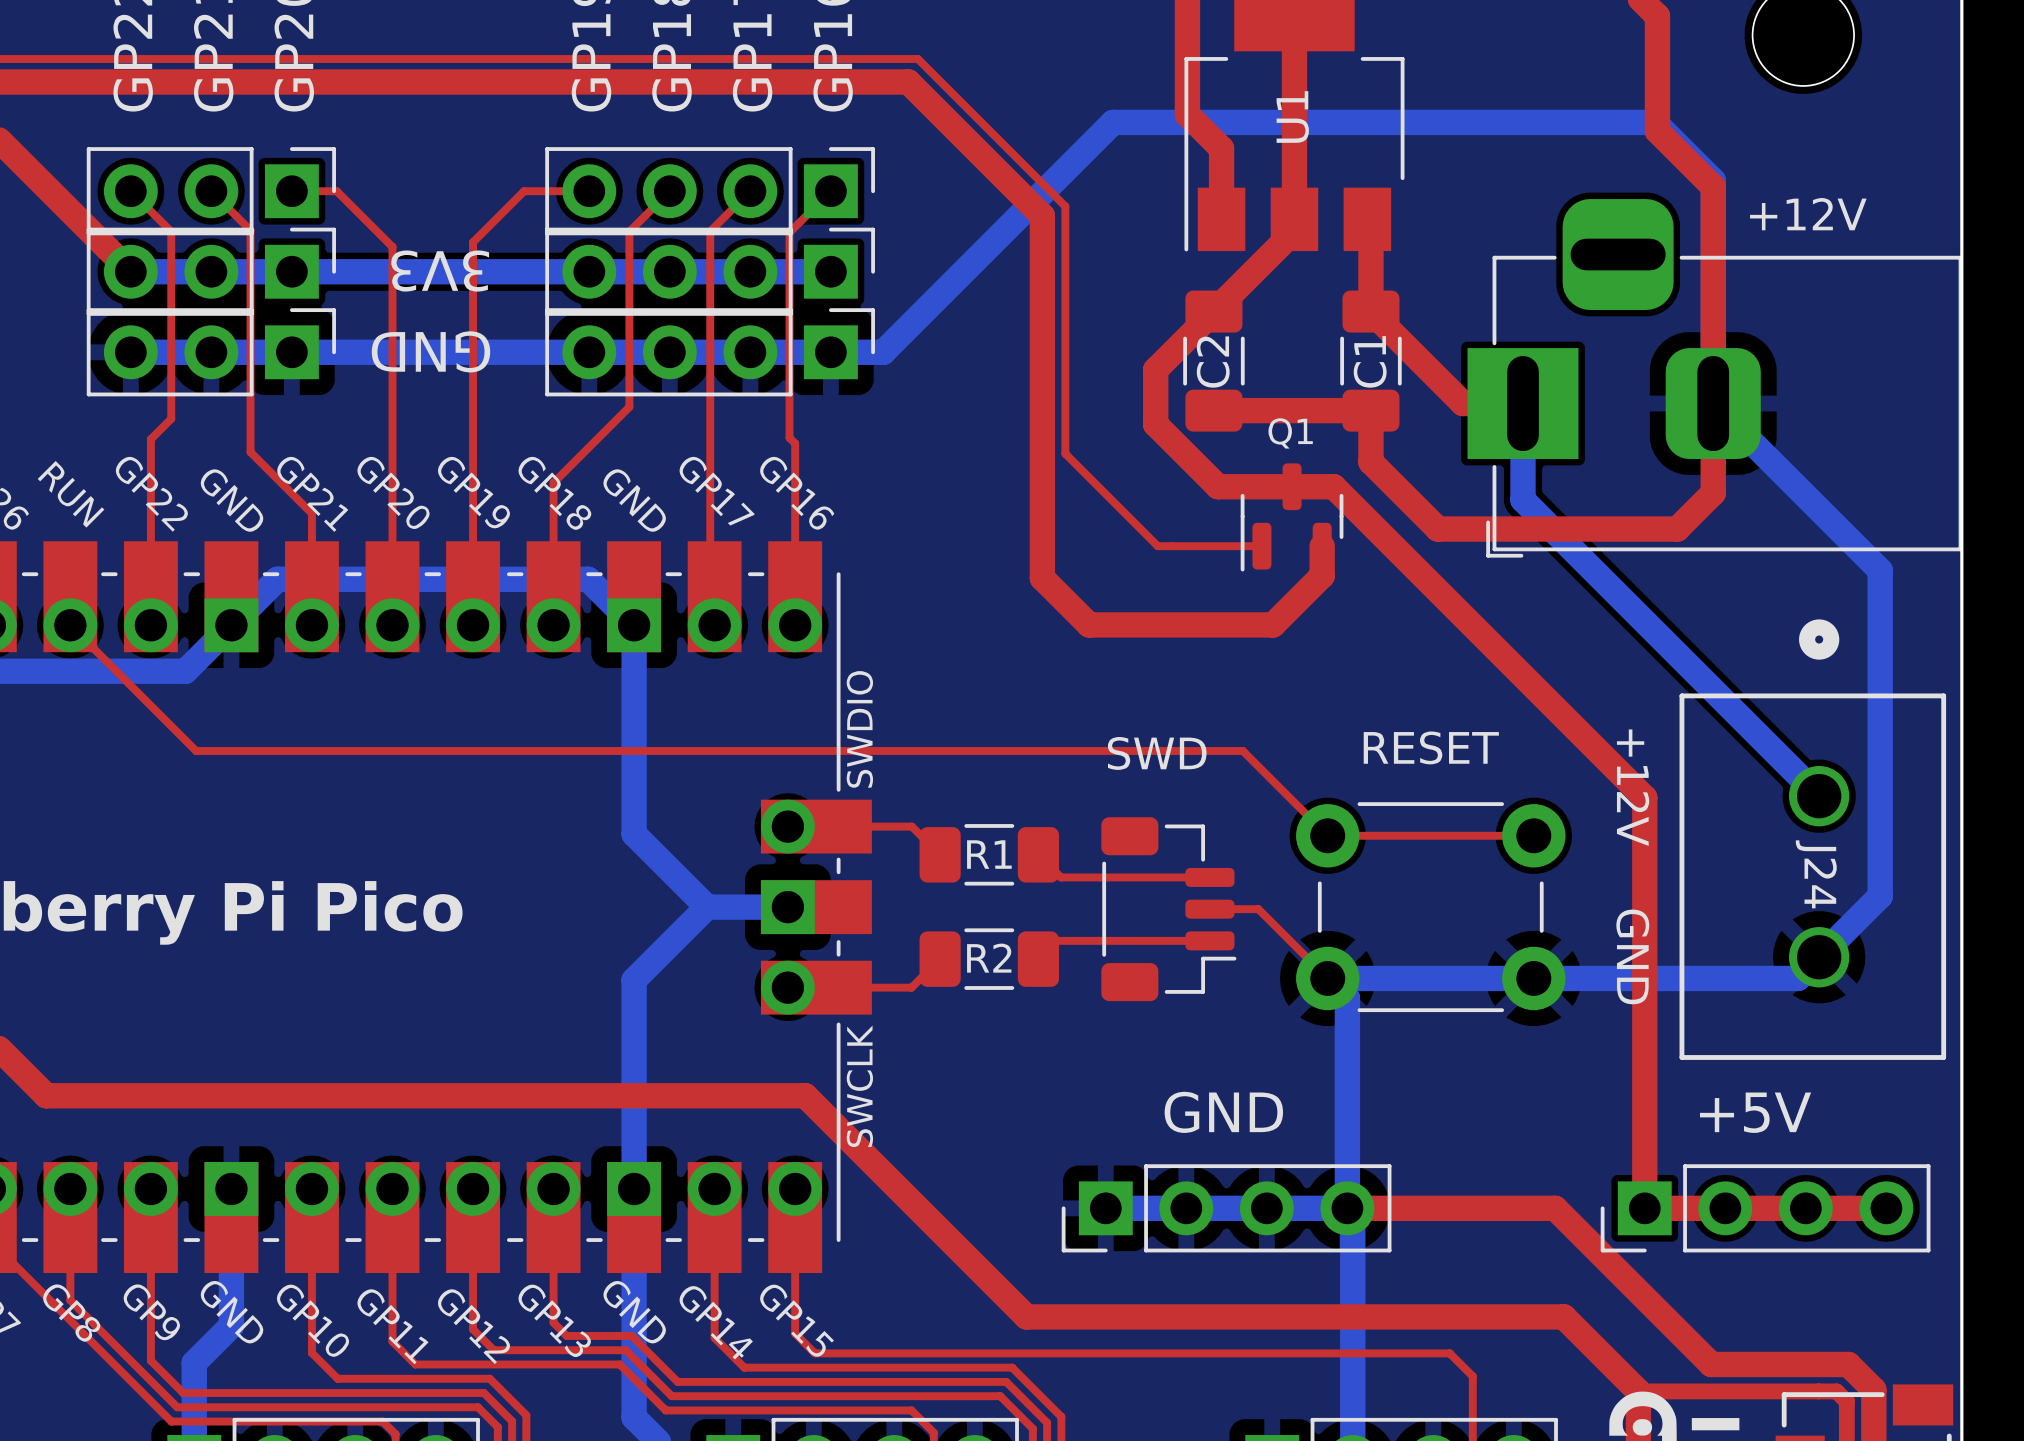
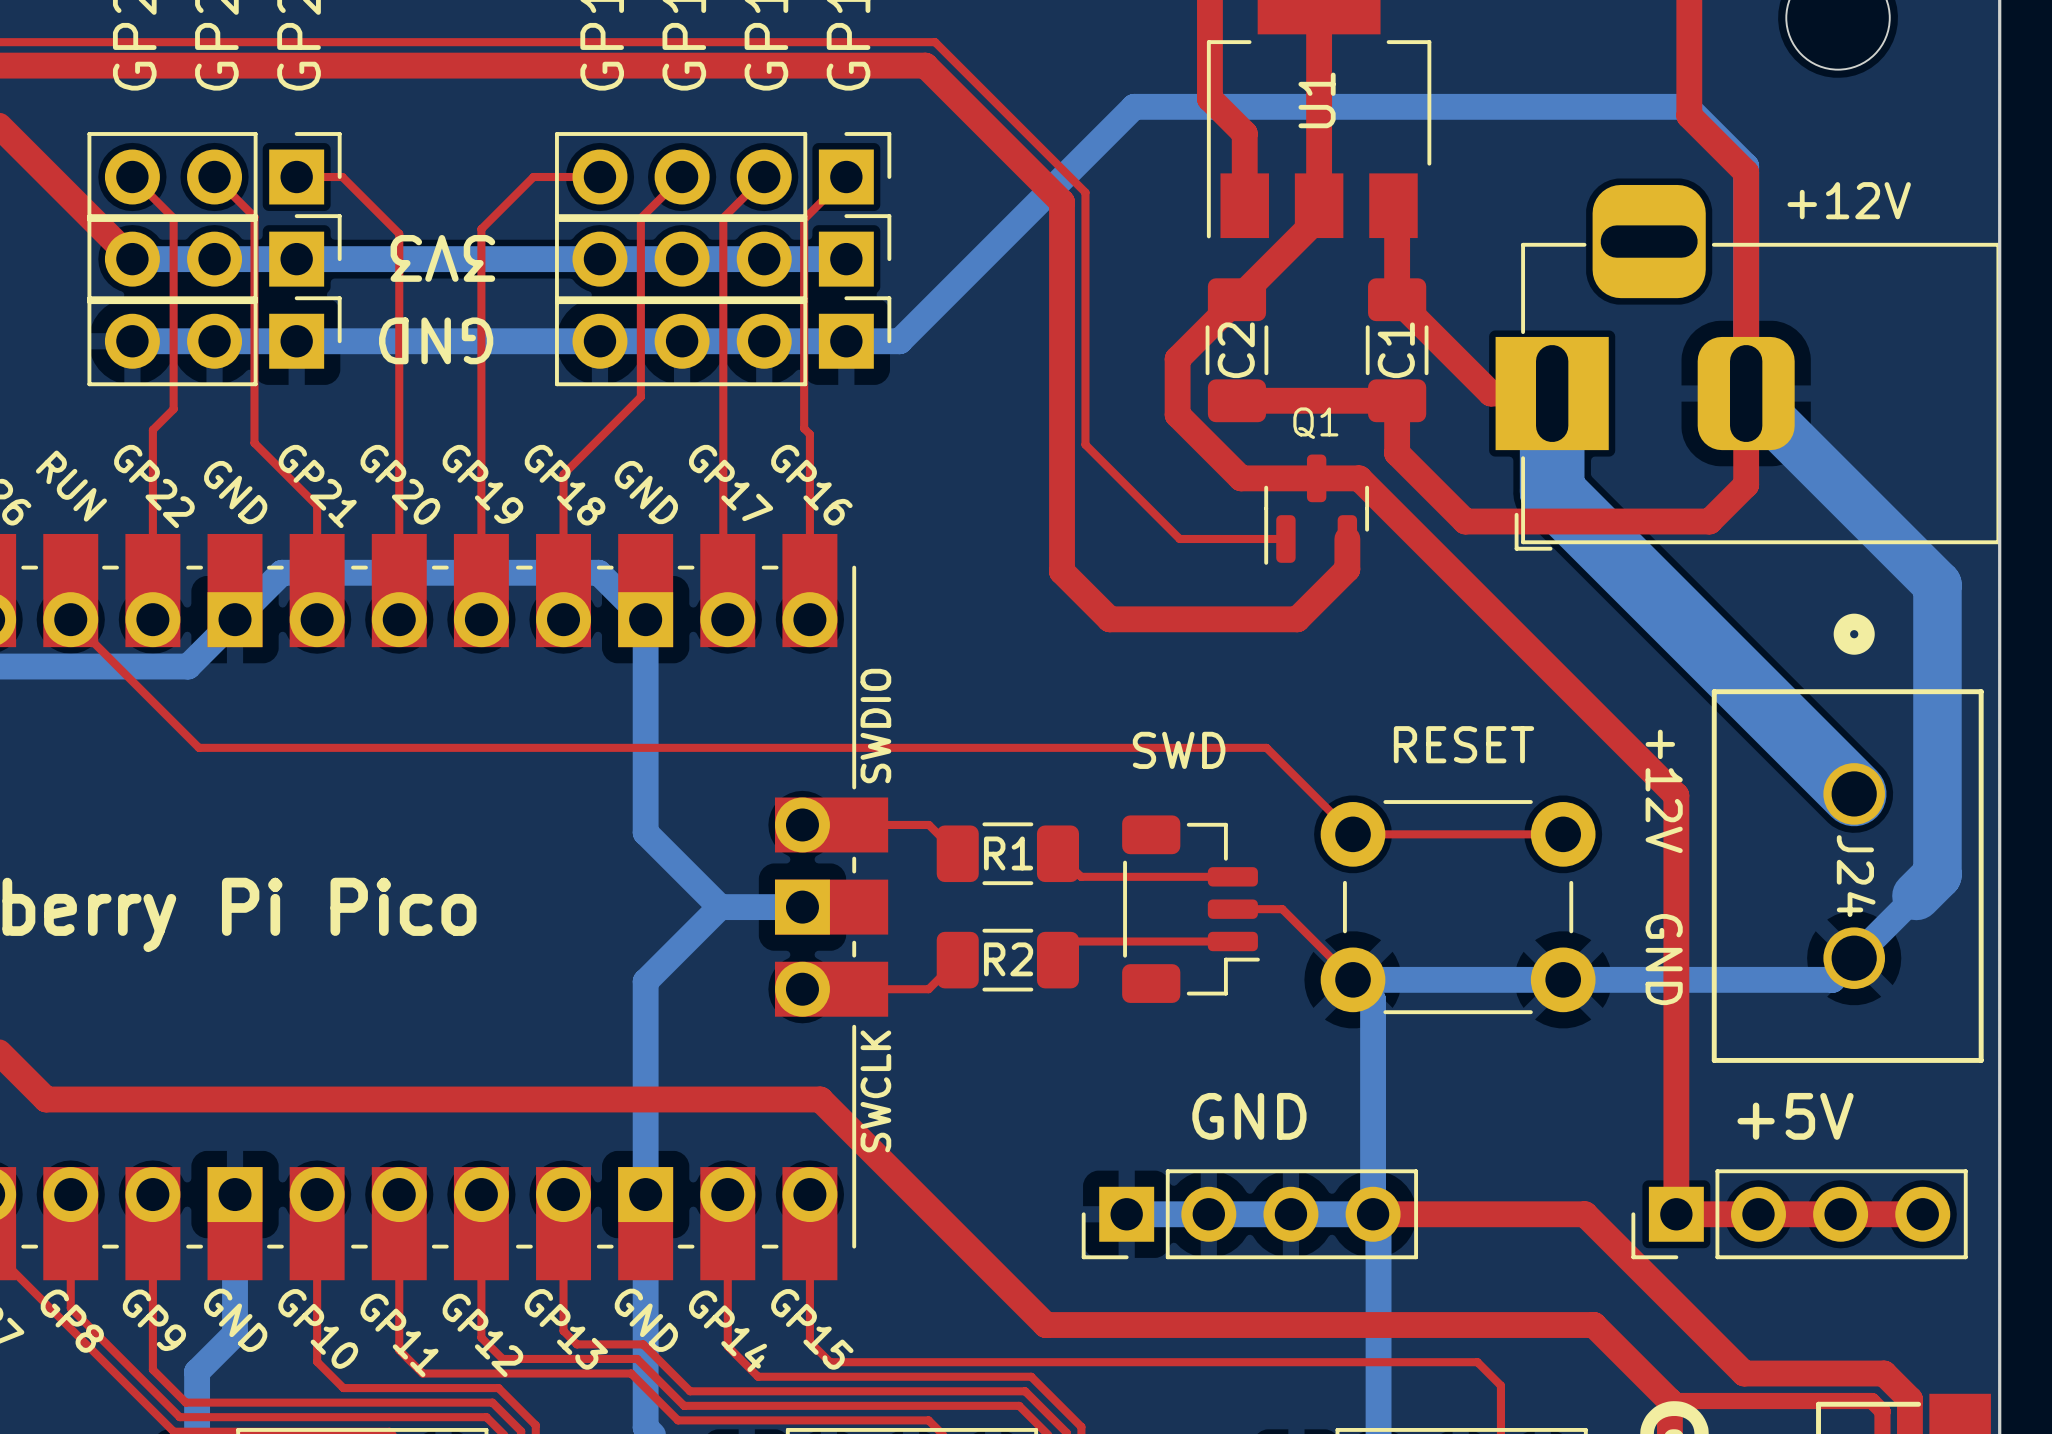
bottom track width: thin (1523, 403) (1523, 500) (1819, 796) -> thick (1552, 393) (1552, 491) (1854, 793)
bottom track width: thin (1713, 403) (1880, 570) -> thick (1746, 393) (1916, 563)
bottom track: (1880, 570) (1880, 896) -> (1916, 563) (1937, 584) (1937, 874) (1916, 895)

